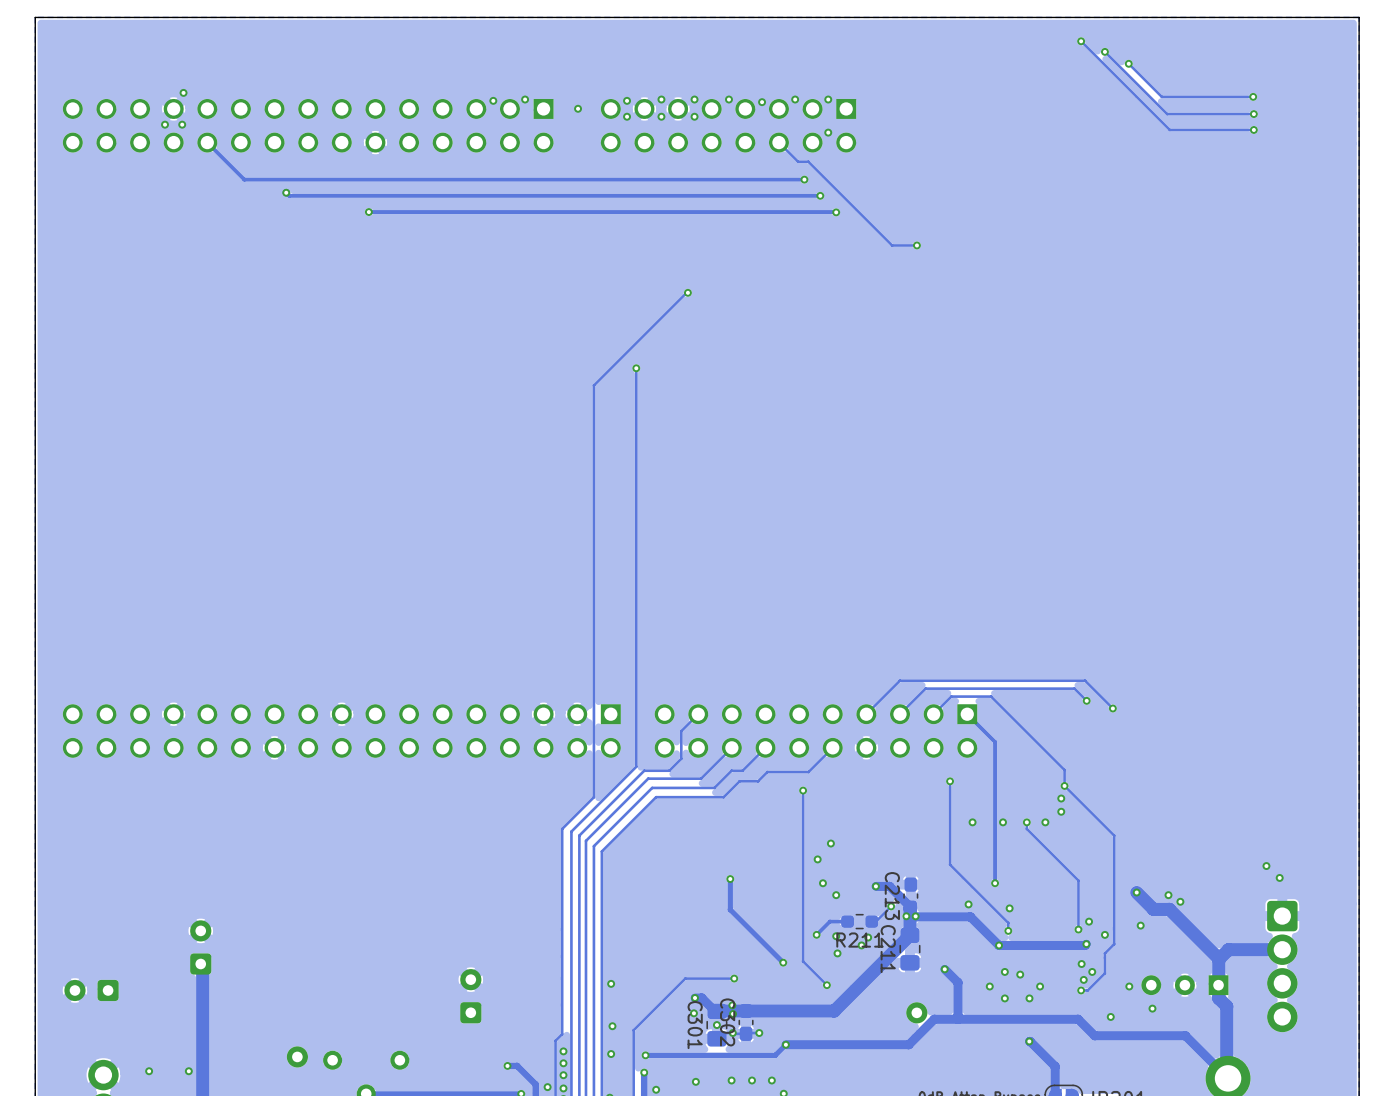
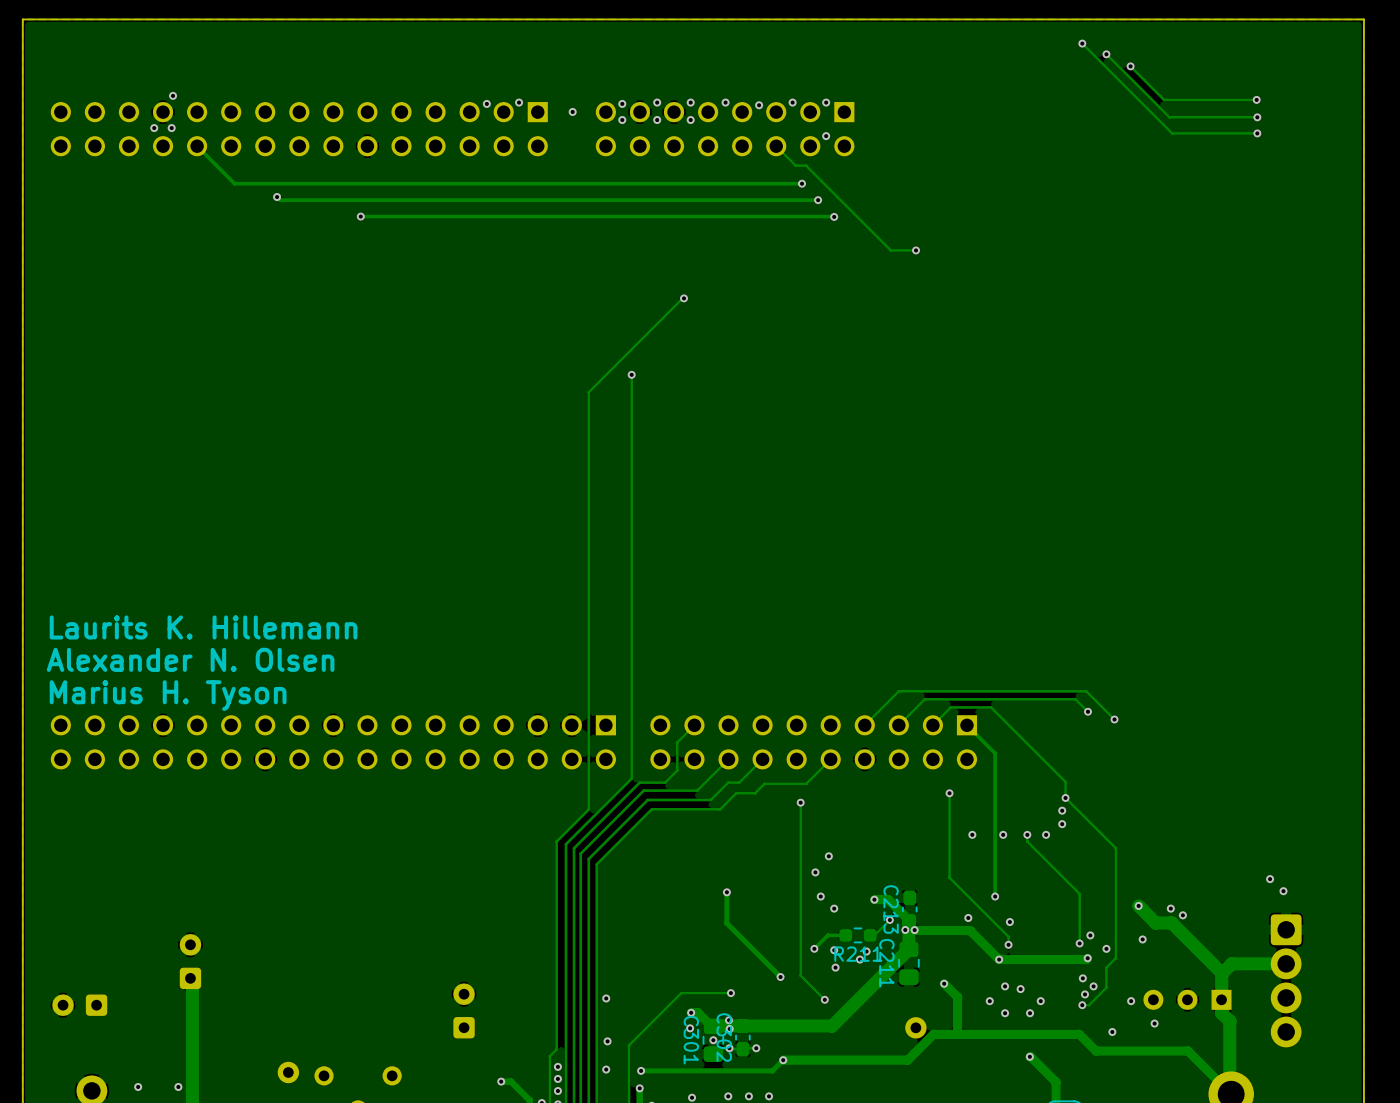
text: none -> Laurits K. Hillemann (203, 627)
text: none -> Alexander N. Olsen (190, 659)
text: none -> Marius H. Tyson (168, 695)

